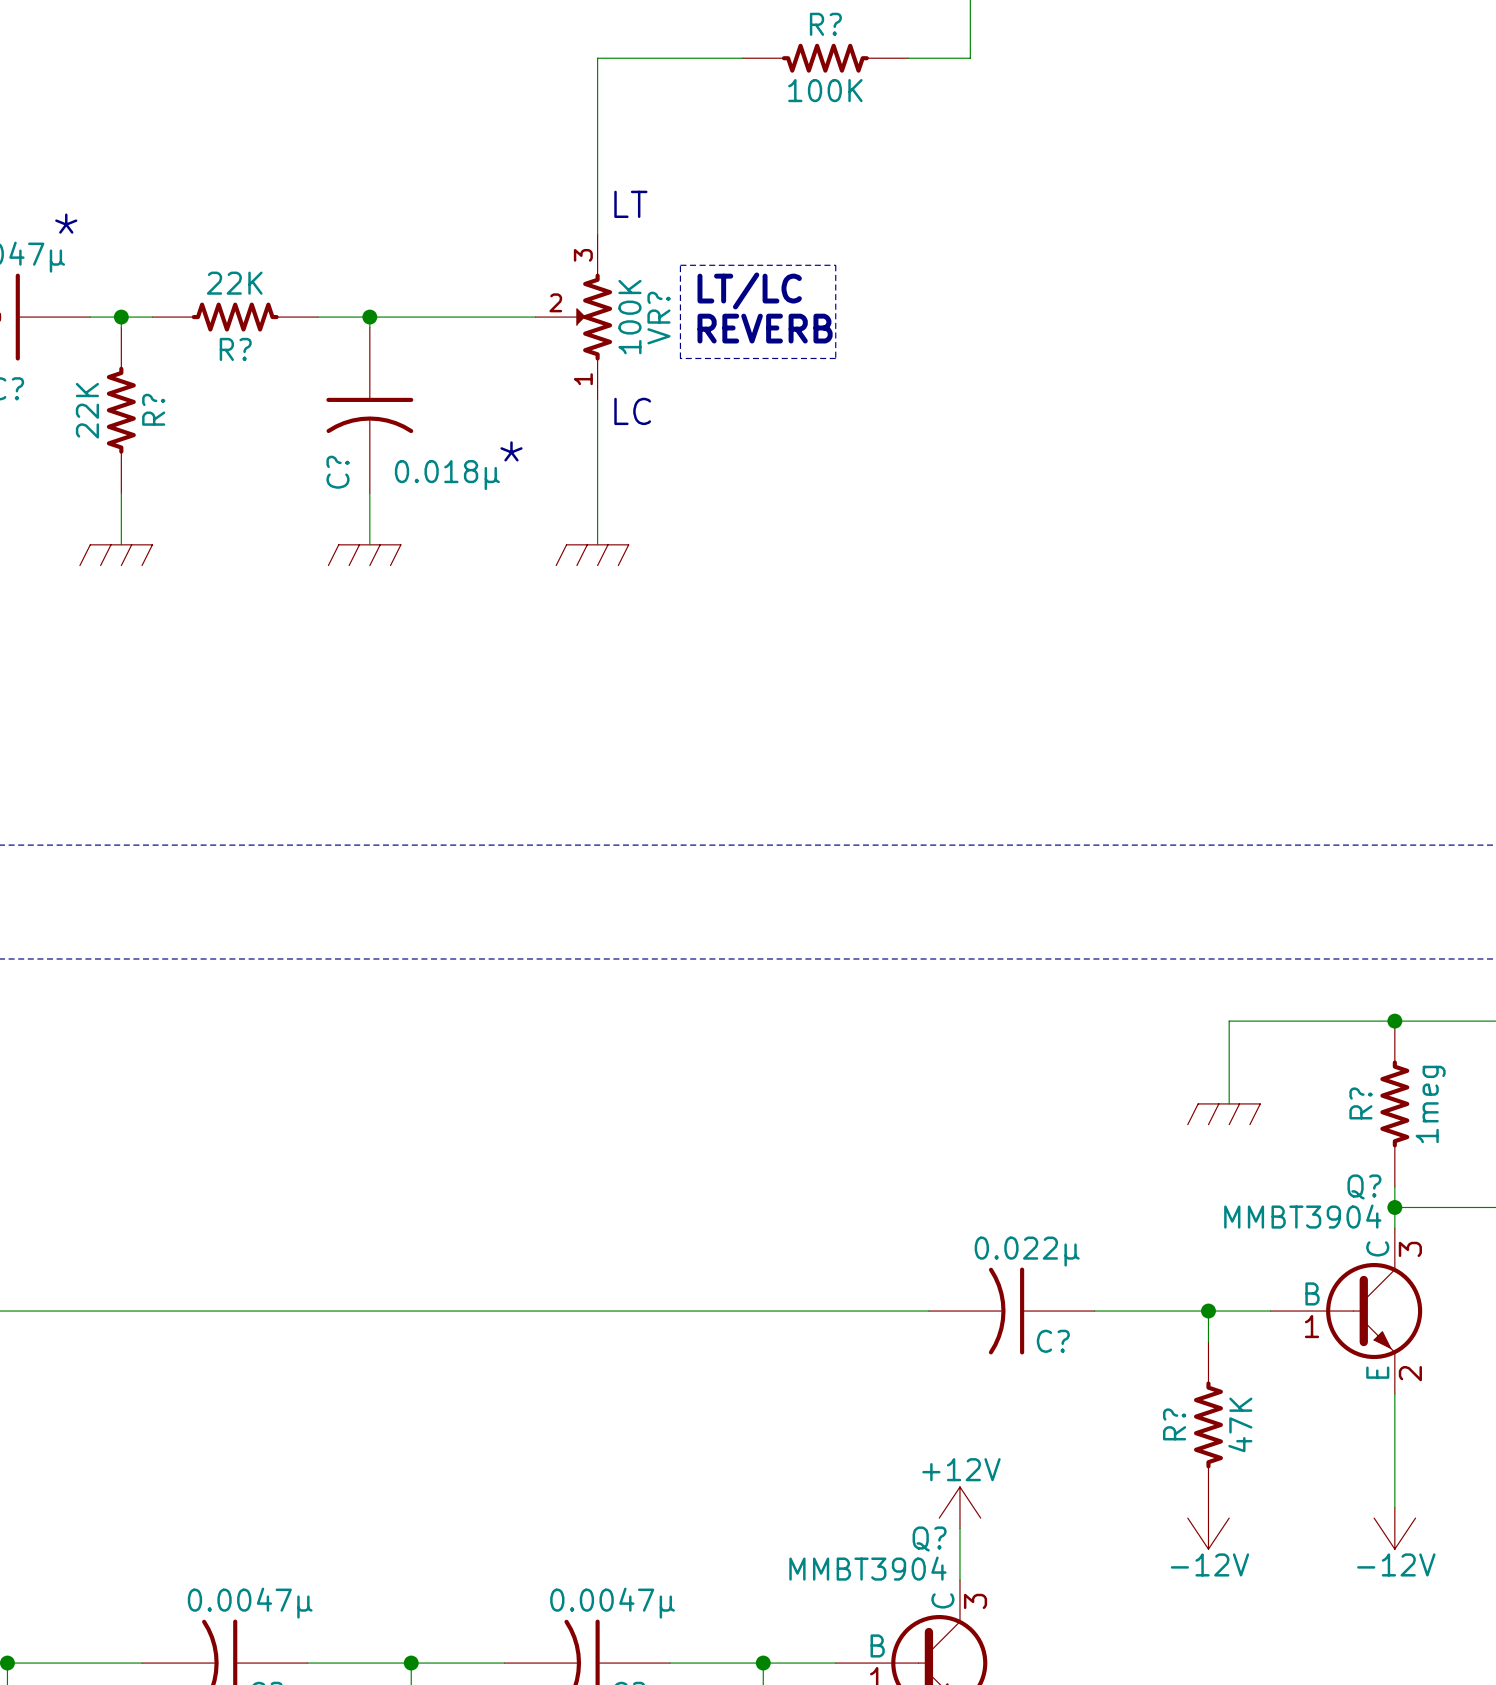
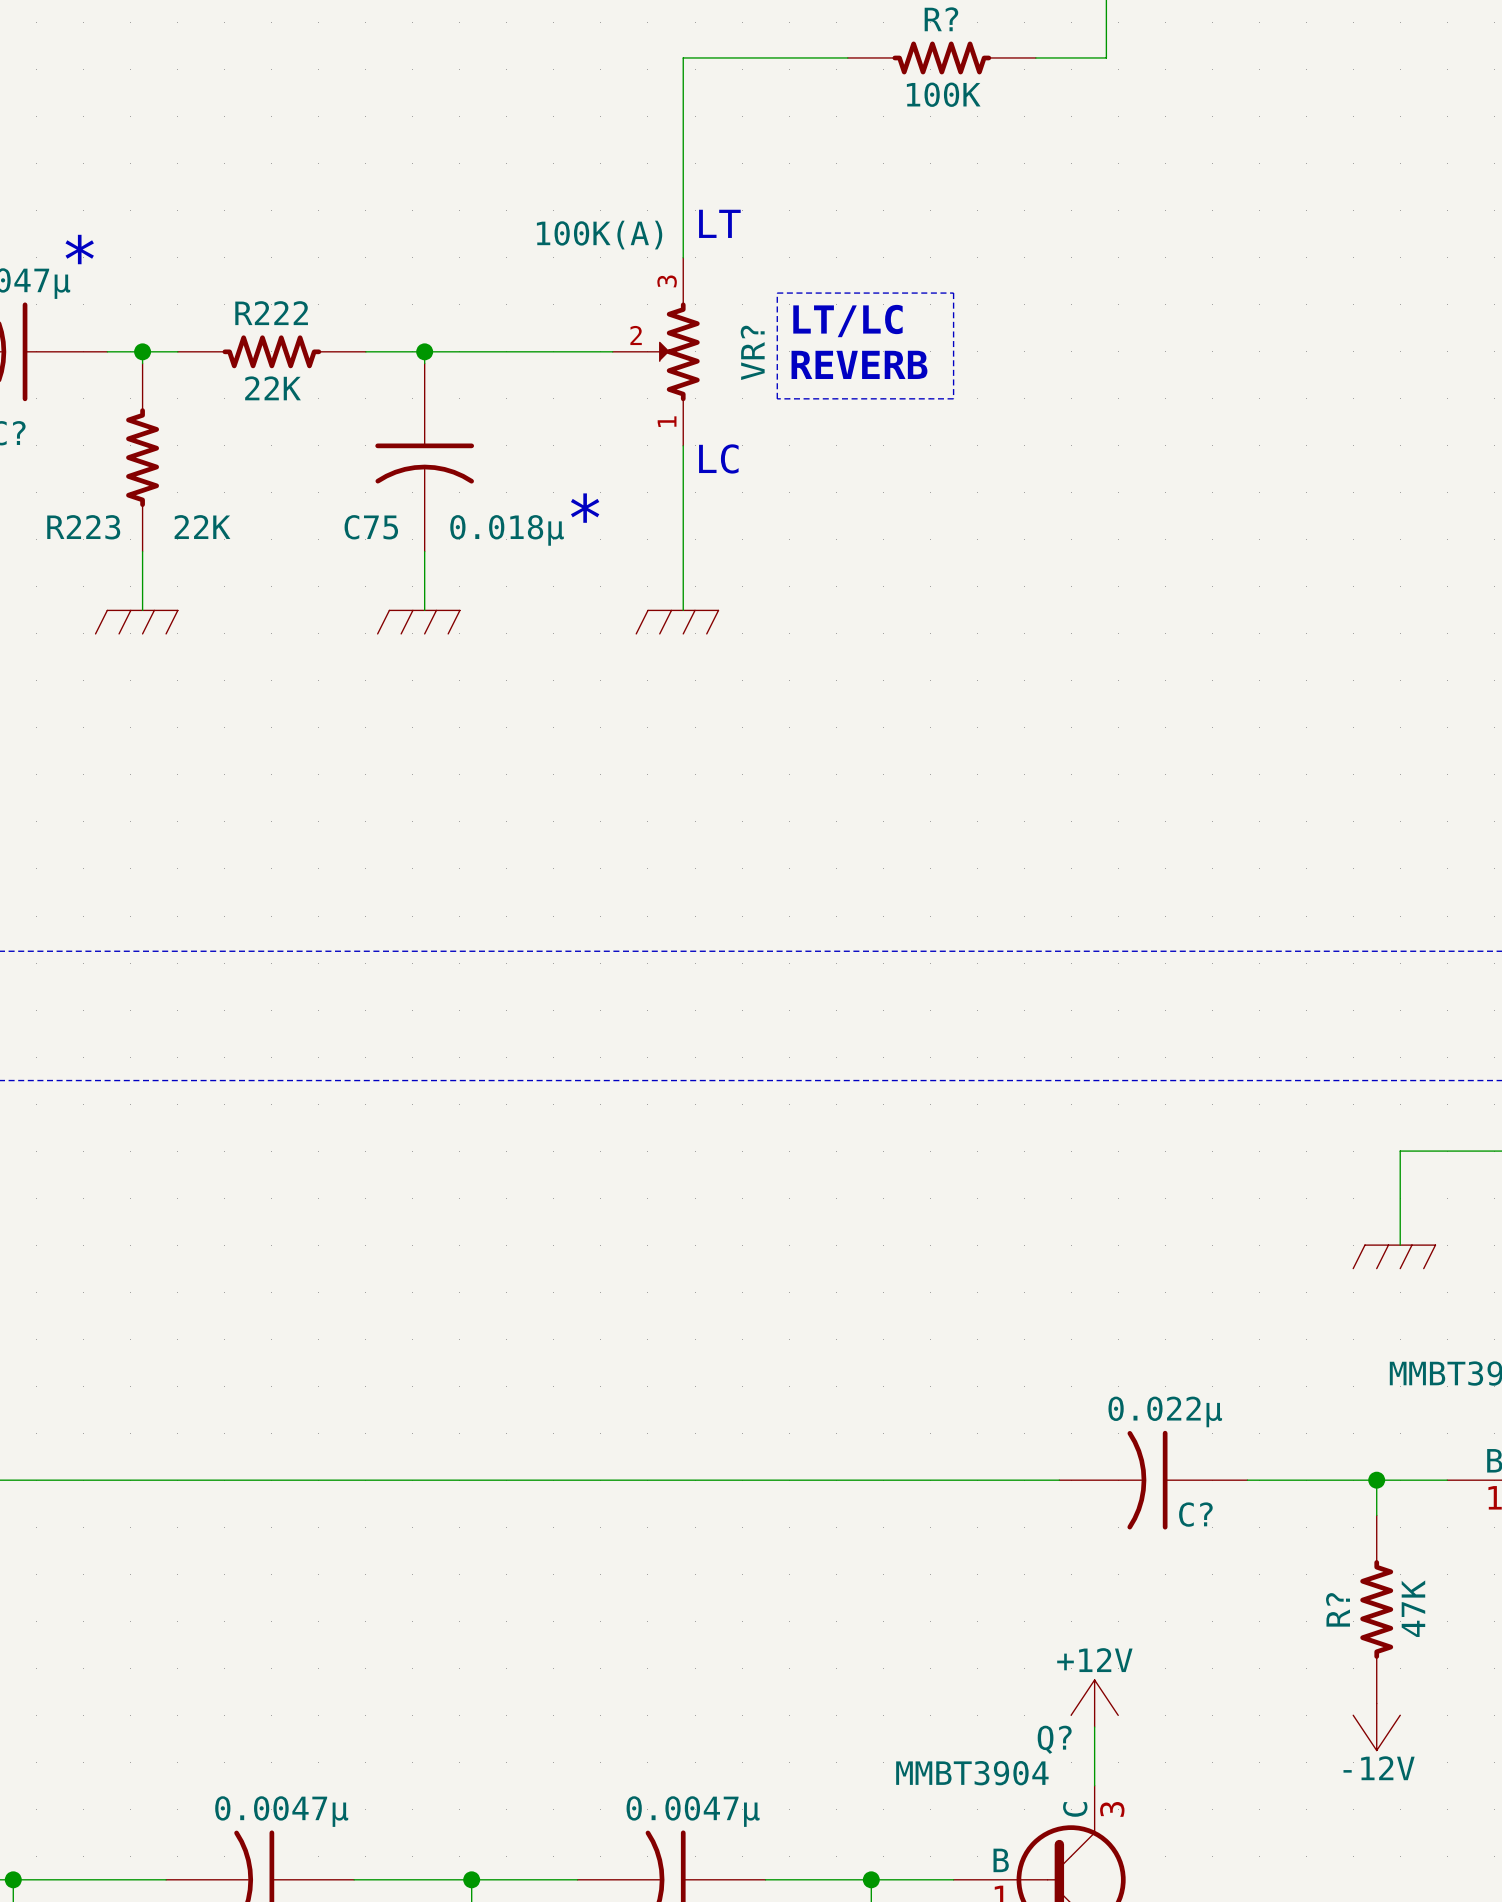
R?: 22K (235, 317) -> none
R222: none -> 22K (271, 351)
VR? value: 100K (629, 317) -> 100K(A) (599, 235)
R? name: R? (153, 409) -> R223 (83, 527)
R? value rotation: 0° (87, 410) -> 90° clockwise (202, 527)
R? value position: 22K (87, 410) -> 22K (202, 527)
C? name: C? (337, 472) -> C75 (371, 527)

